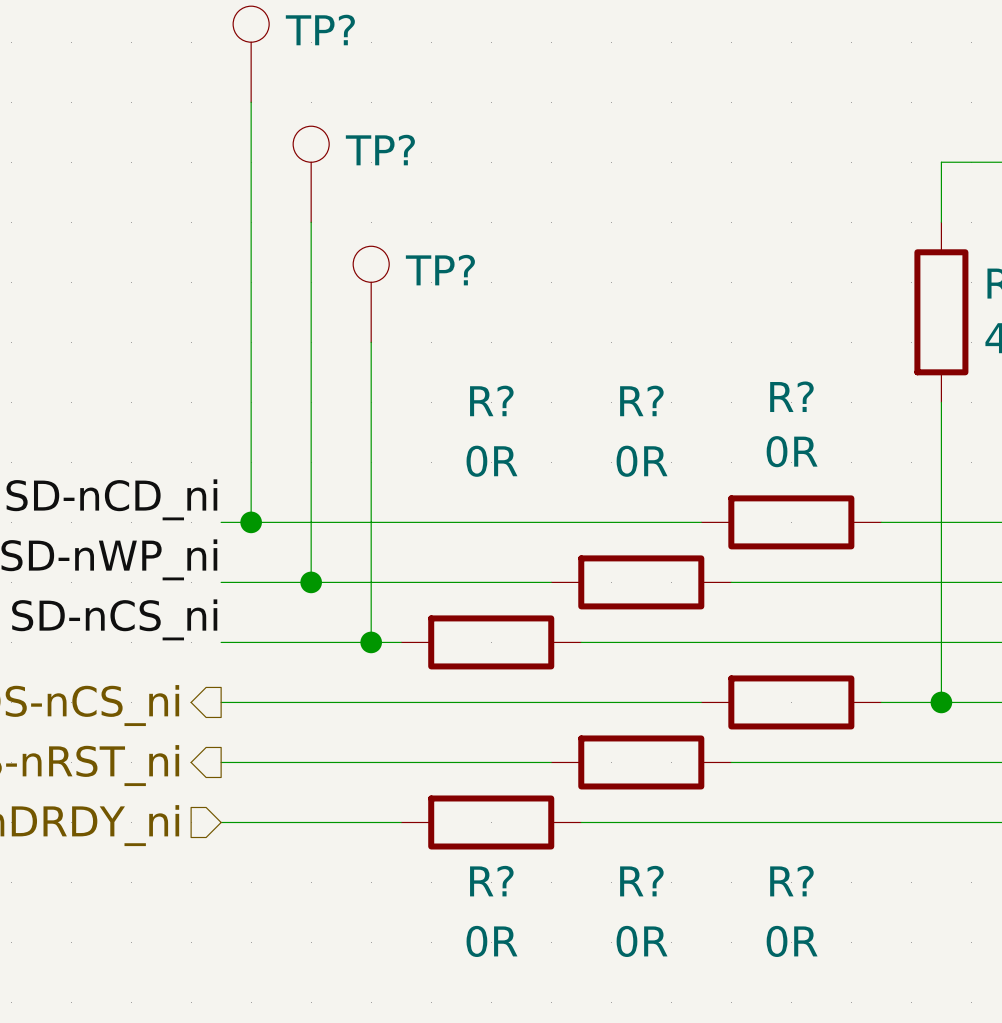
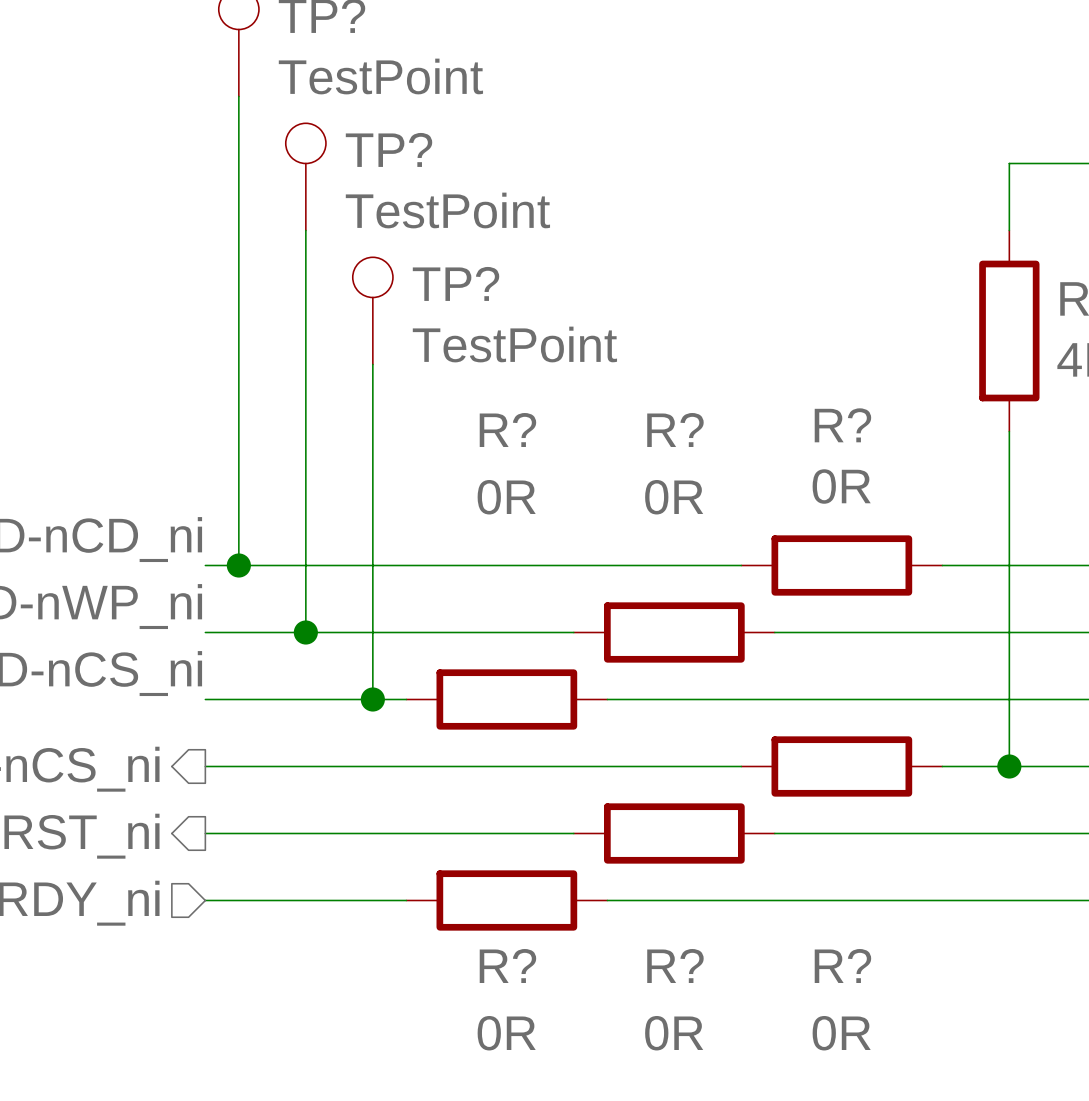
TP? value: none -> TestPoint (380, 76)
TP? value: none -> TestPoint (447, 210)
TP? value: none -> TestPoint (514, 344)

